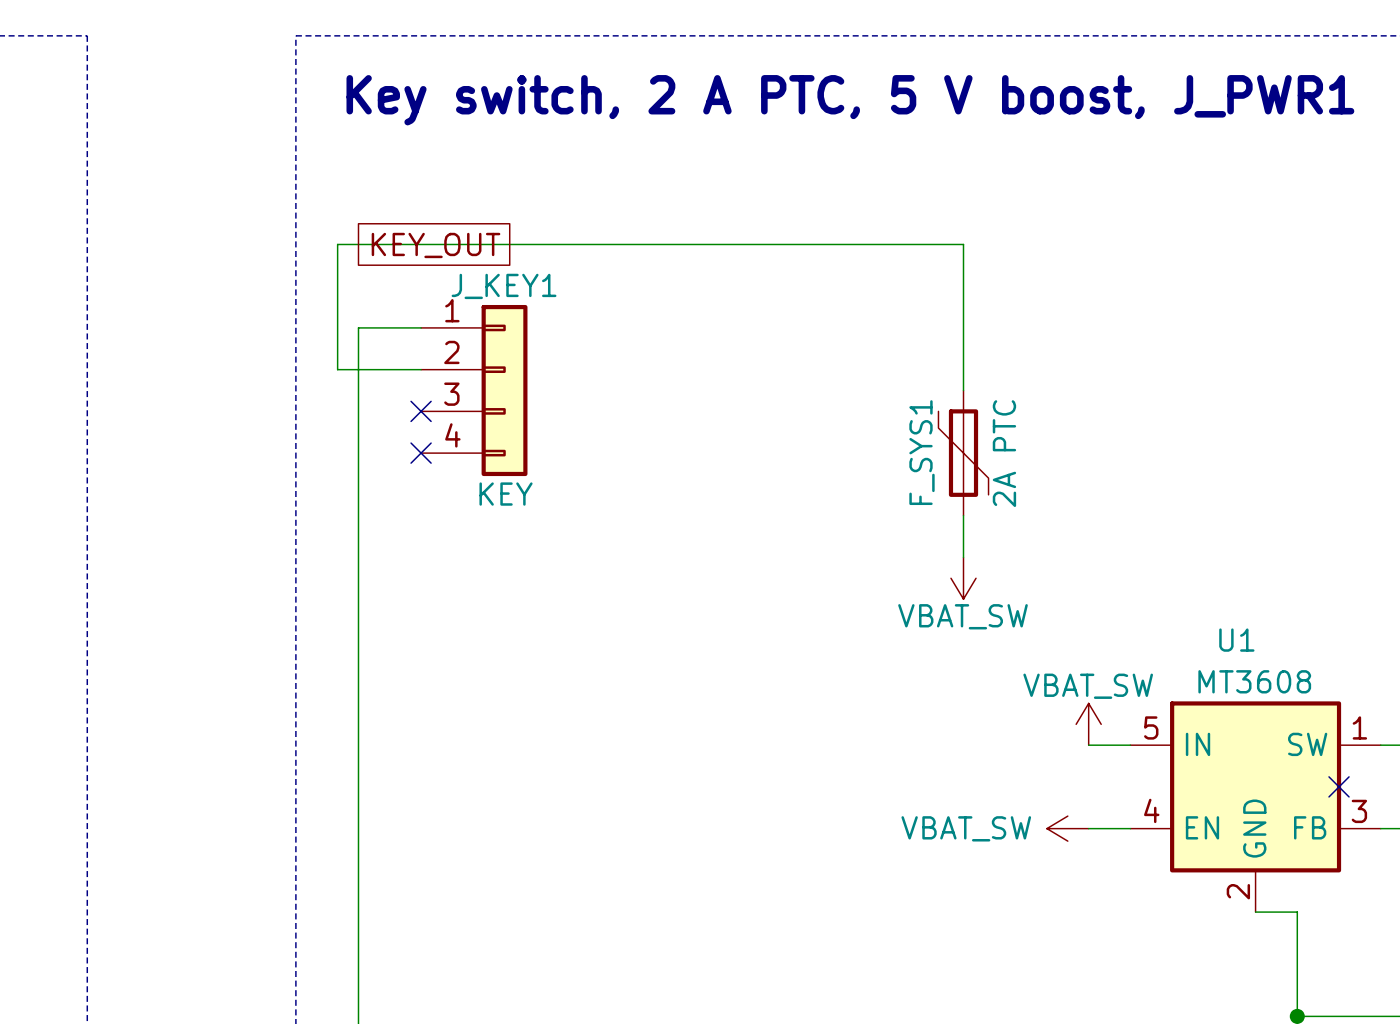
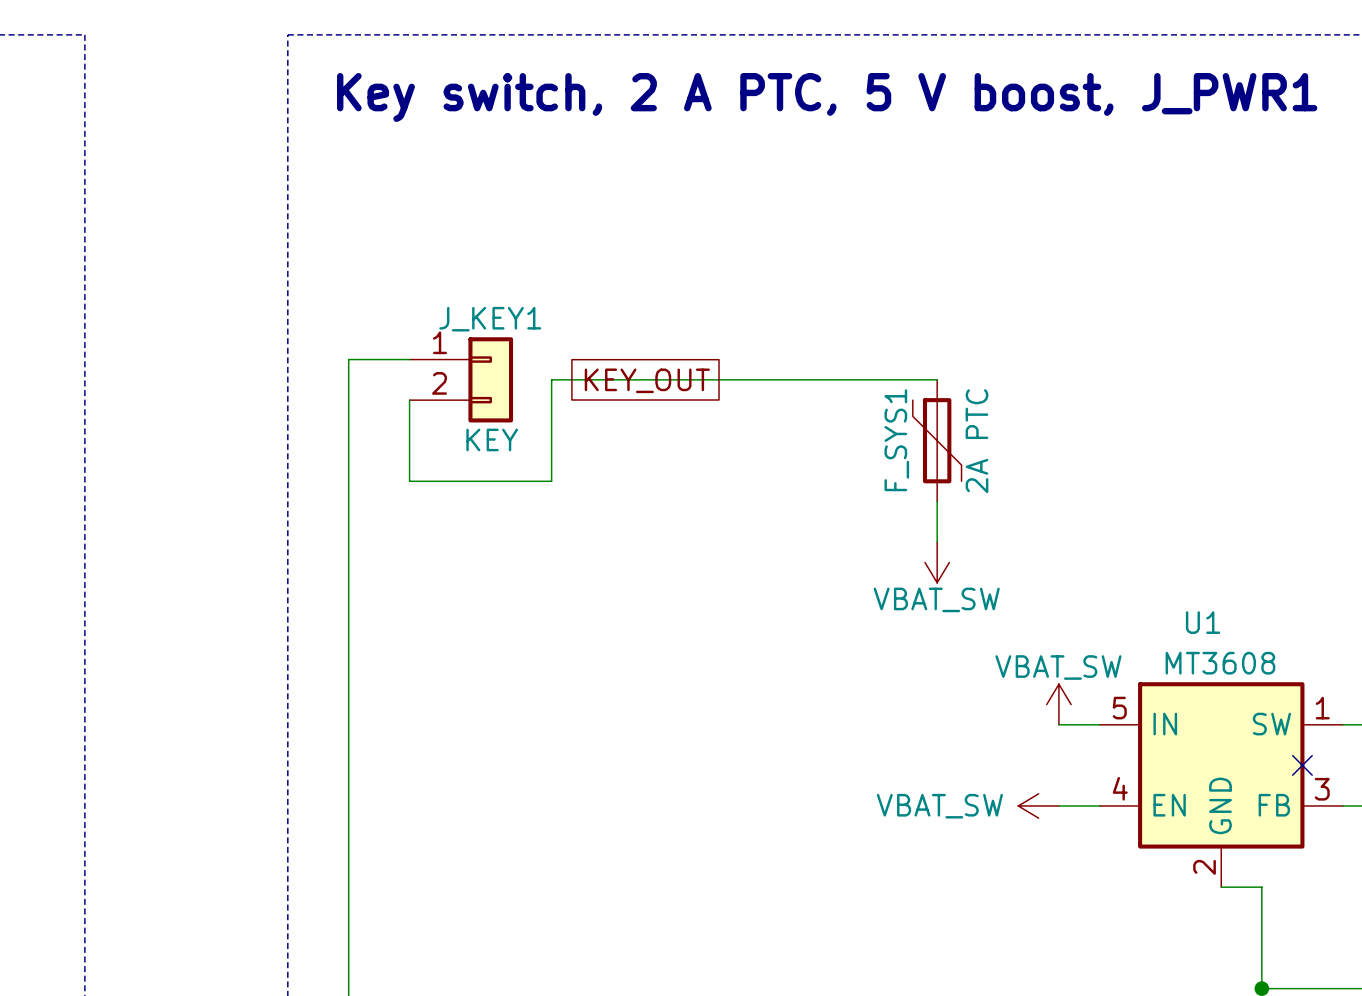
global label position: KEY_OUT (436, 245) -> KEY_OUT (647, 380)
J_KEY1 name position: J_KEY1 (504, 286) -> J_KEY1 (490, 319)
J_KEY1 symbol: [421, 304, 528, 477] -> [409, 337, 514, 423]
wire: (421, 327) (358, 327) (358, 369) (337, 369) (337, 244) (963, 244) (963, 390) -> (409, 400) (409, 481) (551, 481) (551, 379) (937, 379)
no-connect mark: (421, 411) -> none
no-connect mark: (421, 453) -> none
J_KEY1 value position: KEY (506, 494) -> KEY (492, 439)

